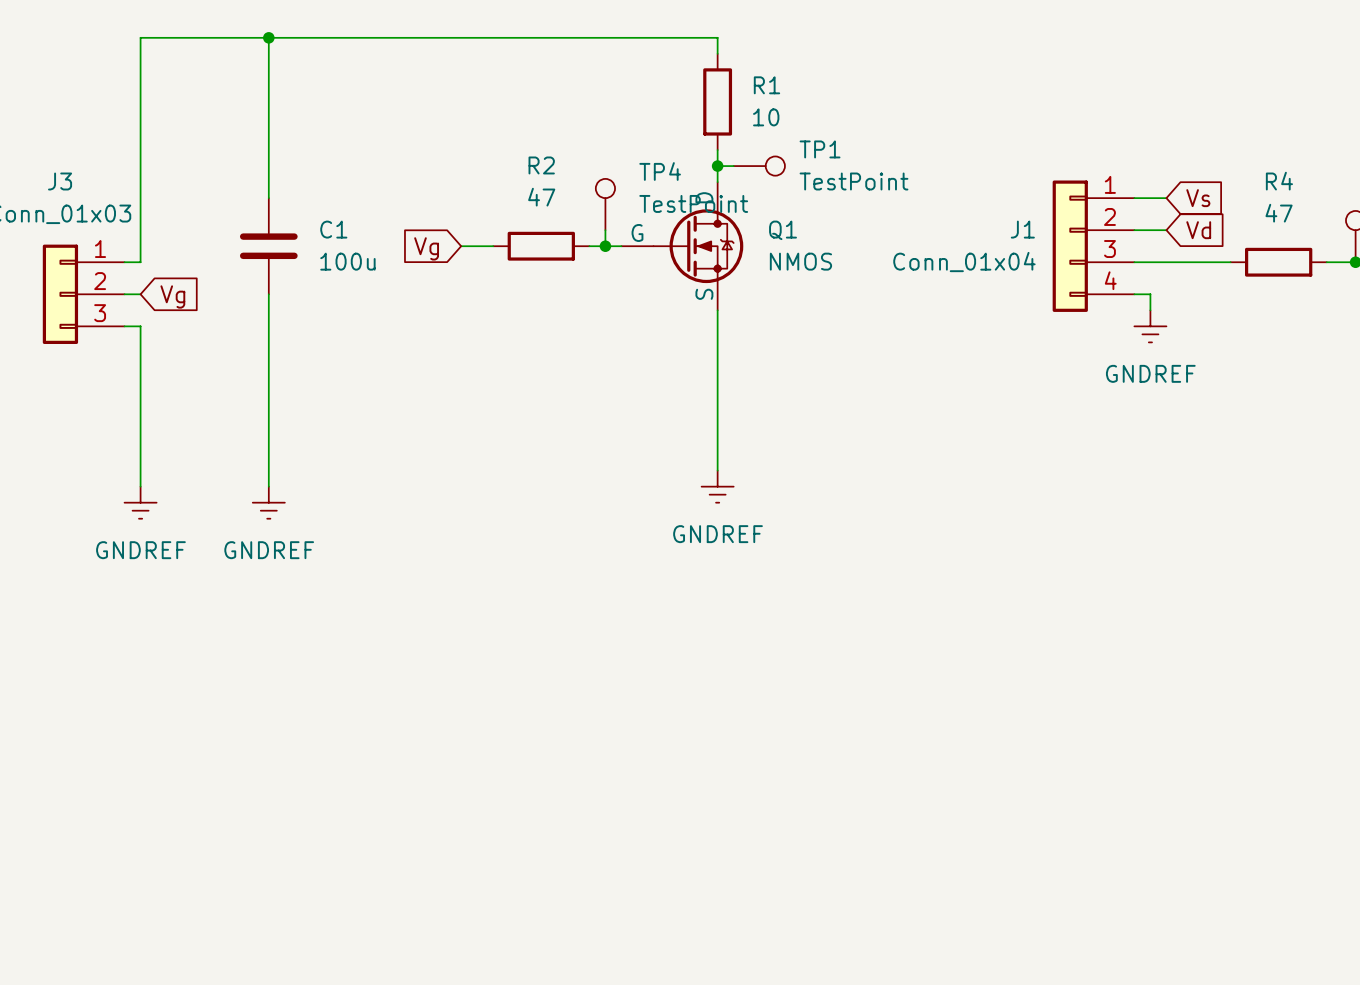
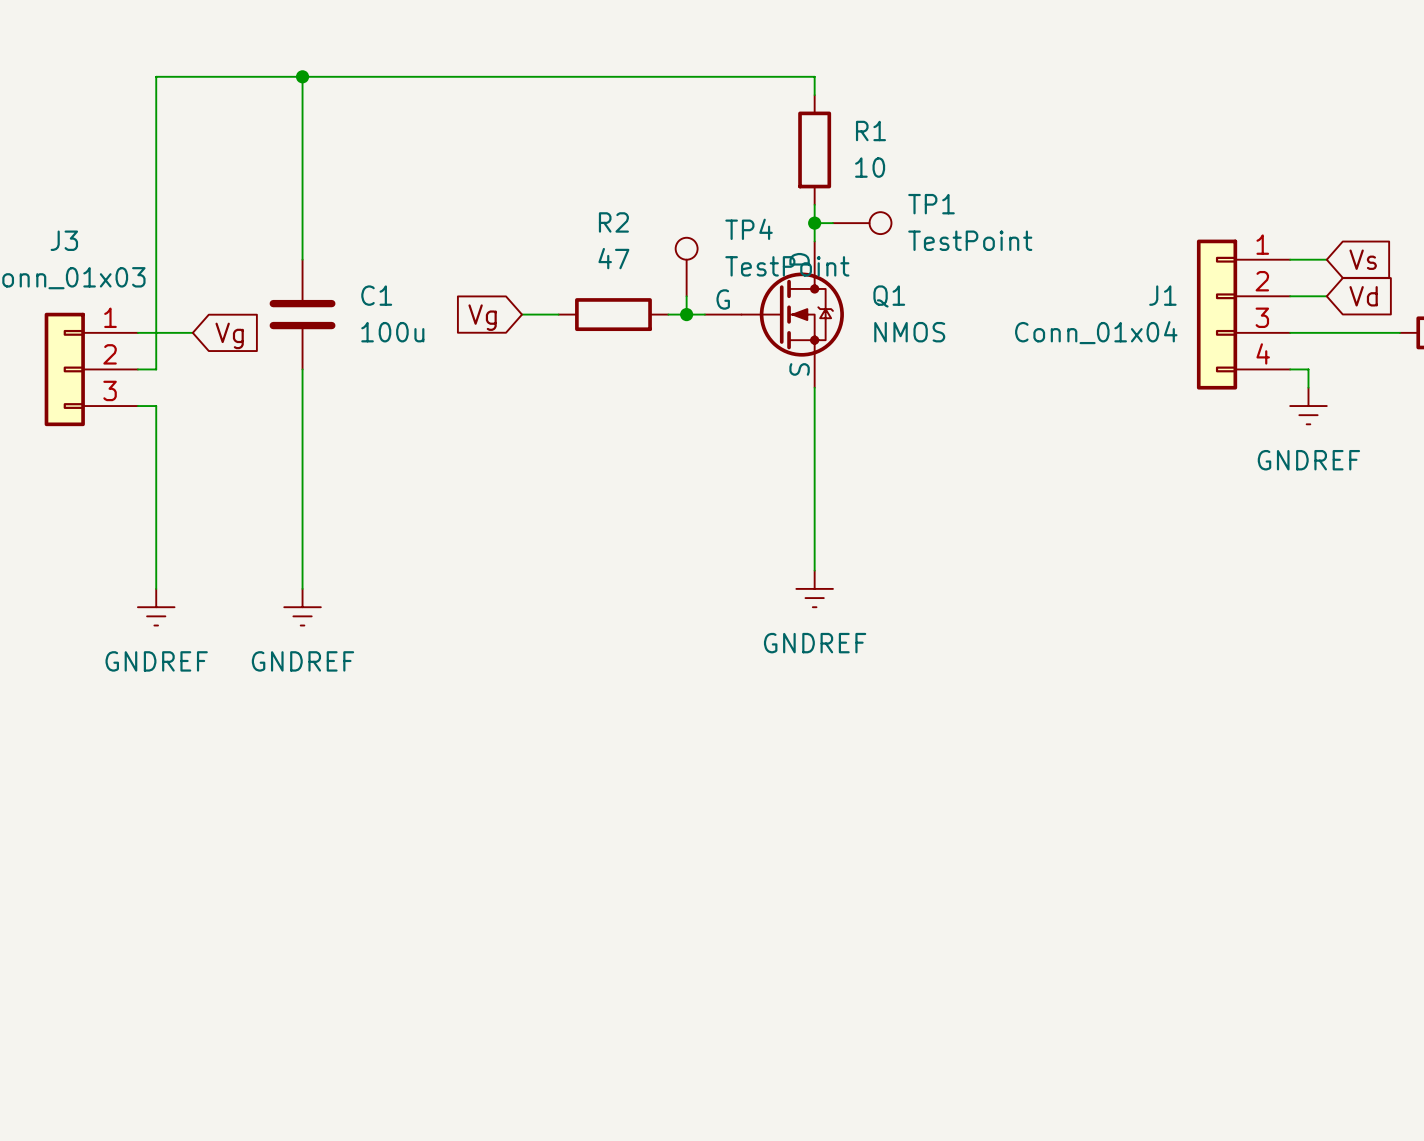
wire: none -> (192, 332) (156, 332) (156, 369)
global label position: Vg (172, 296) -> Vg (229, 335)

